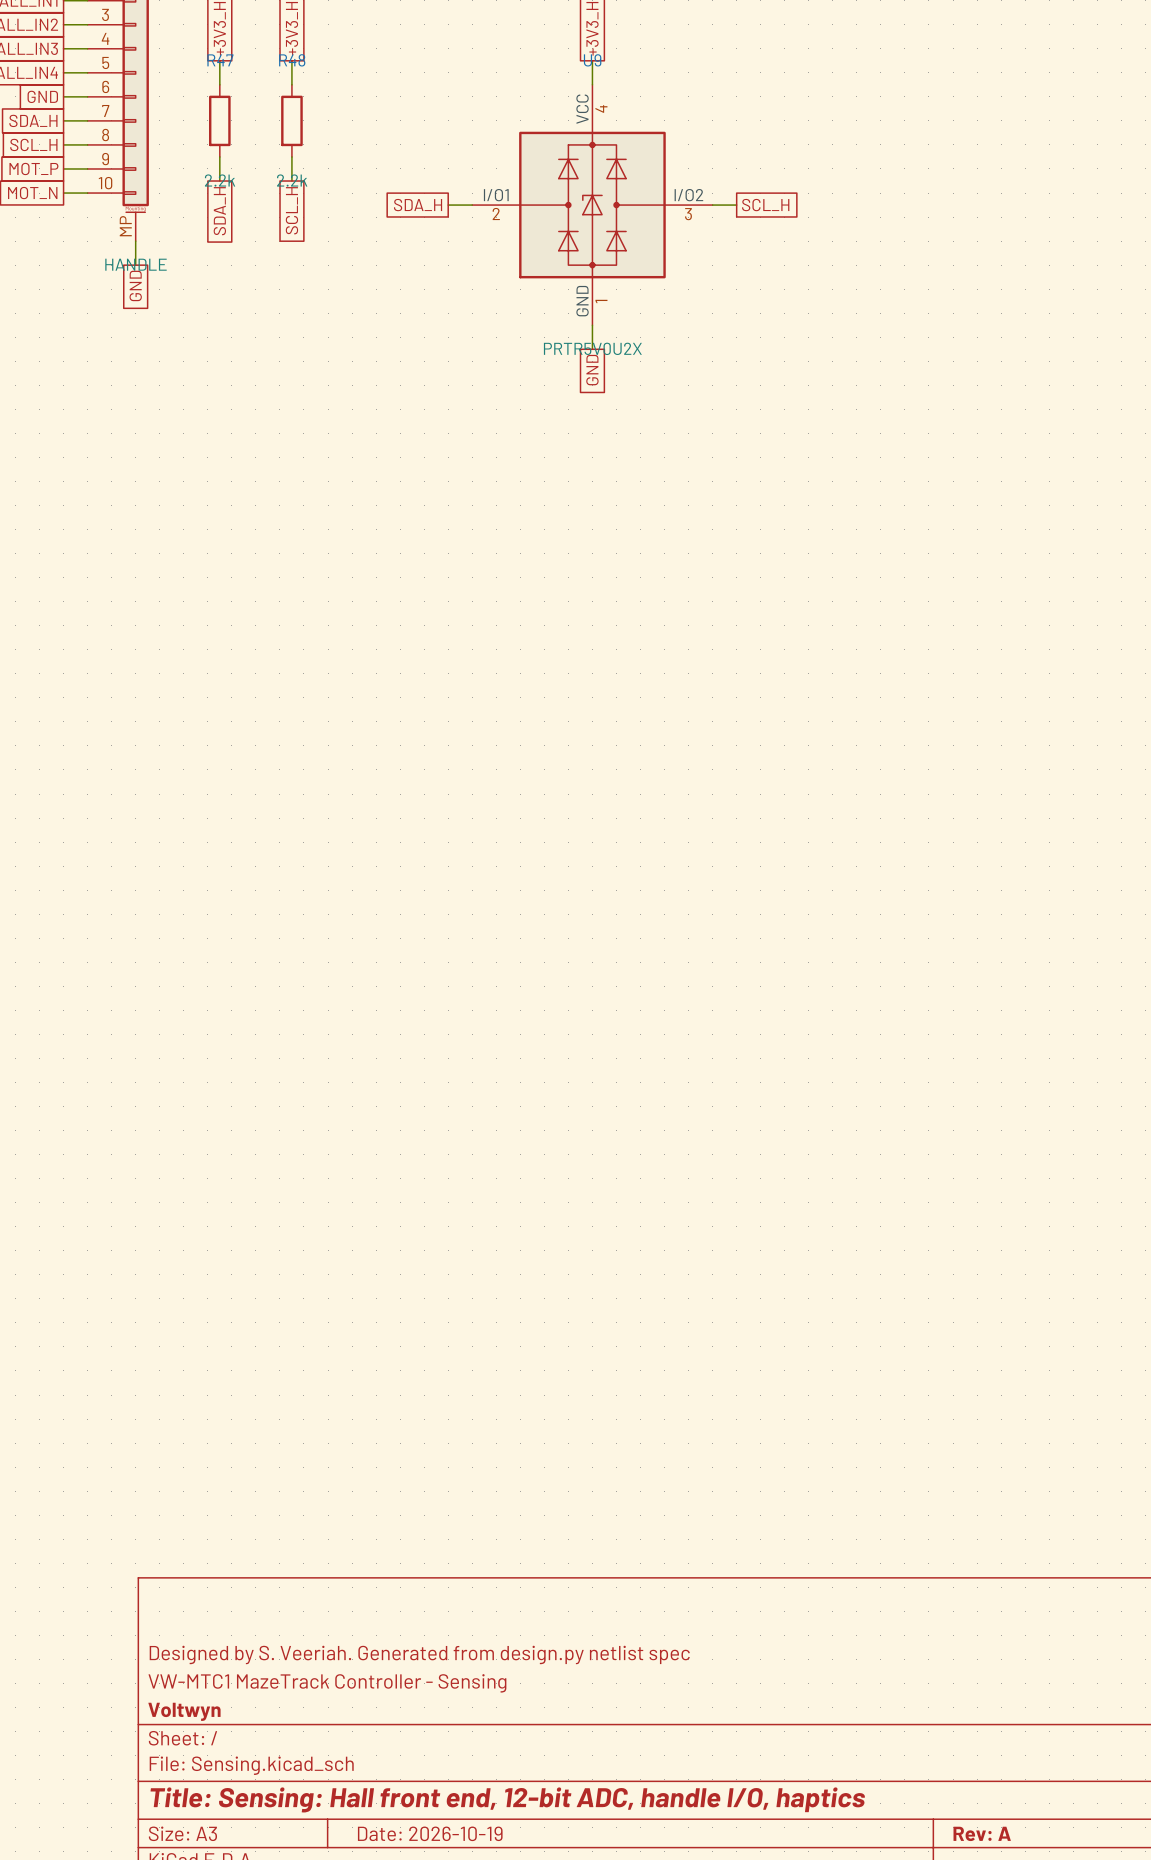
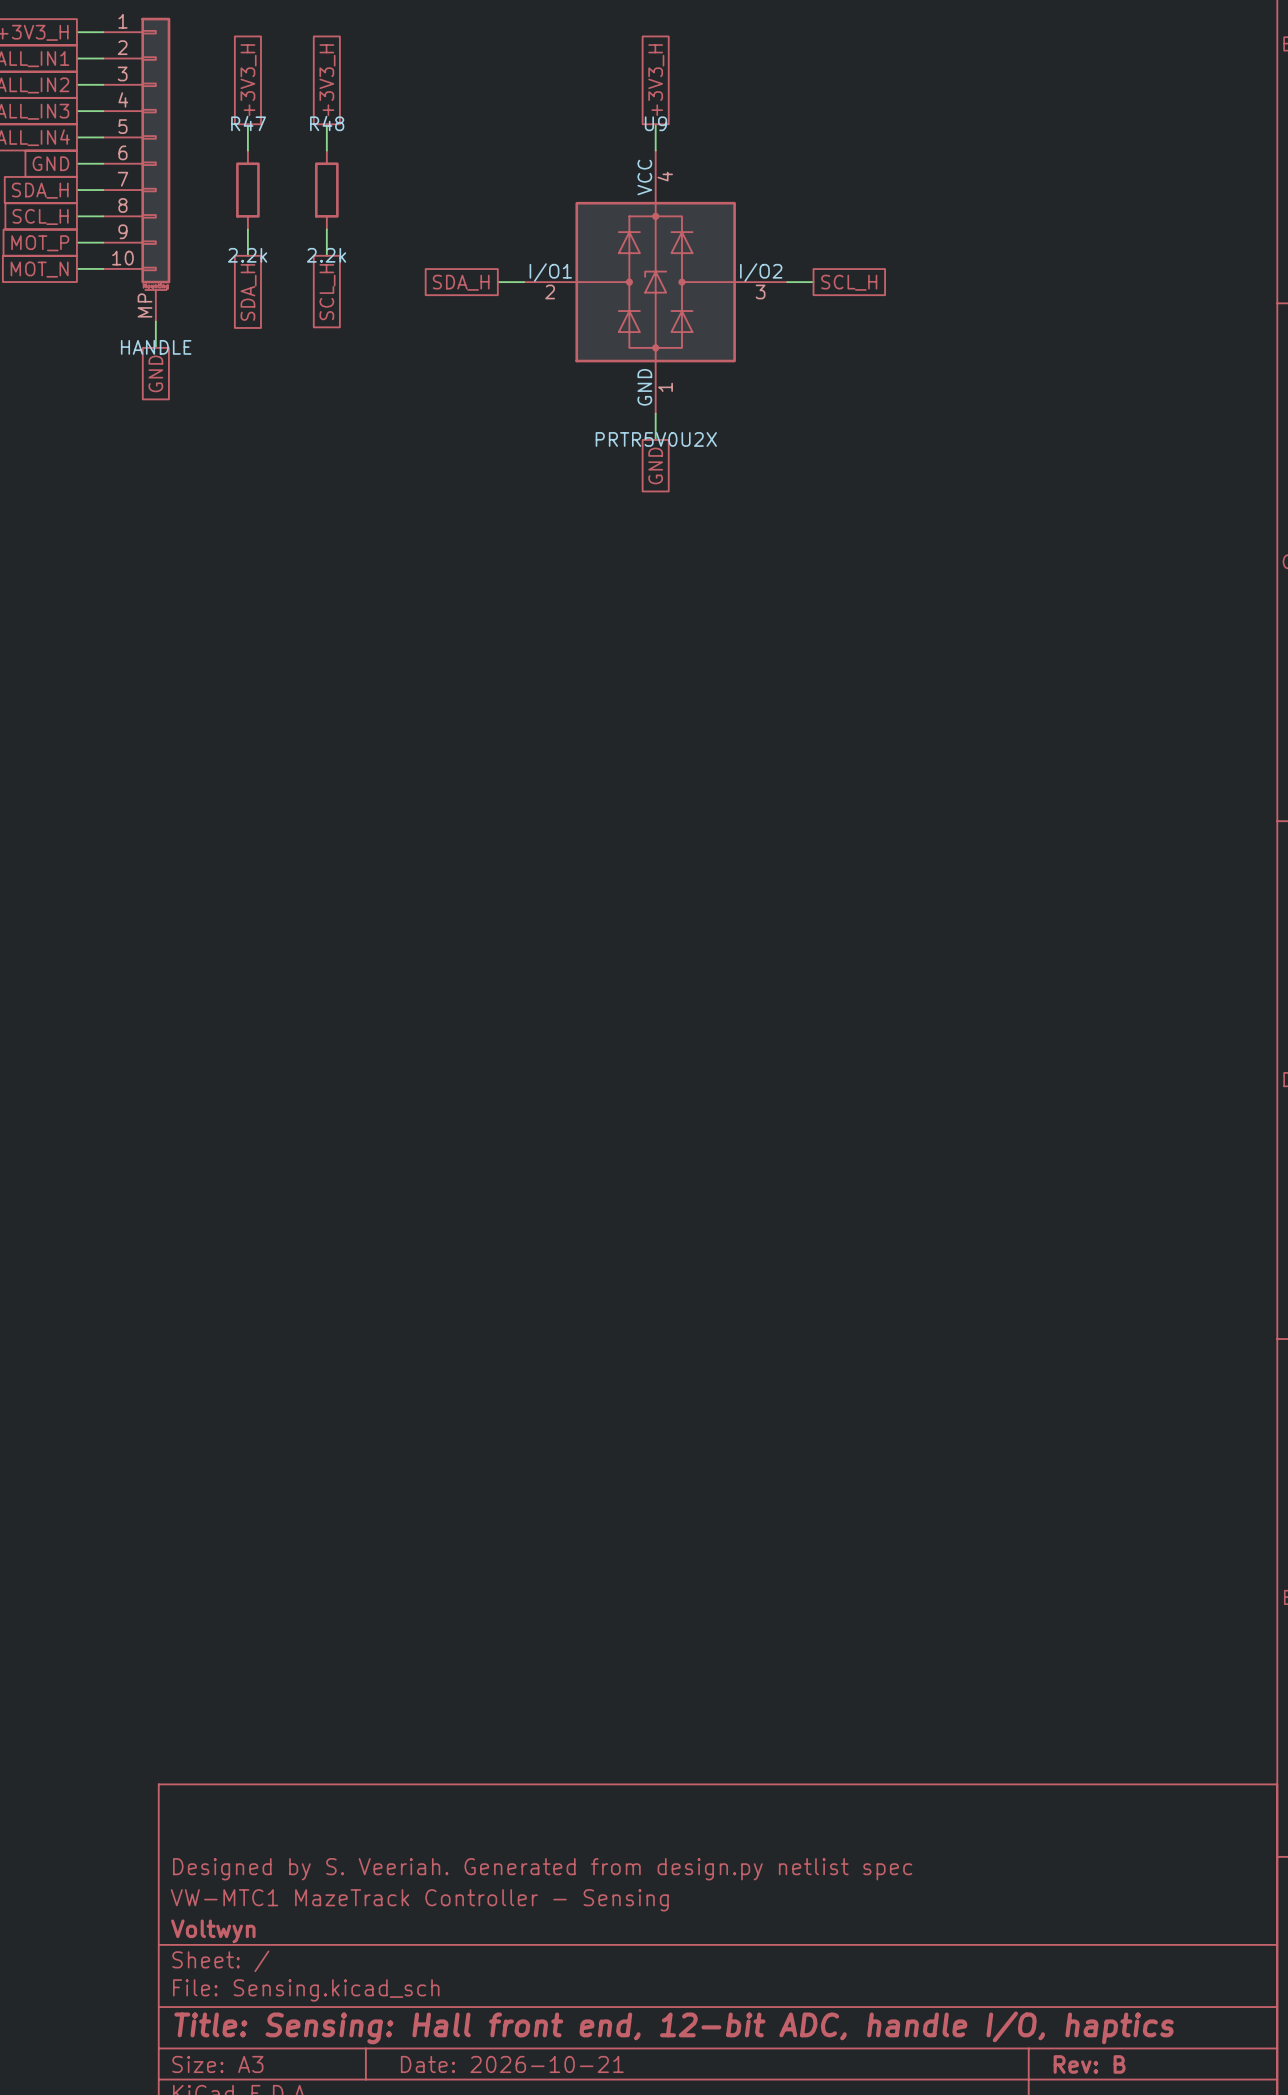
title block: Date: 2026-10-19 (430, 1833) -> Date: 2026-10-21 (512, 2064)
title block: Rev: A (982, 1833) -> Rev: B (1089, 2064)

